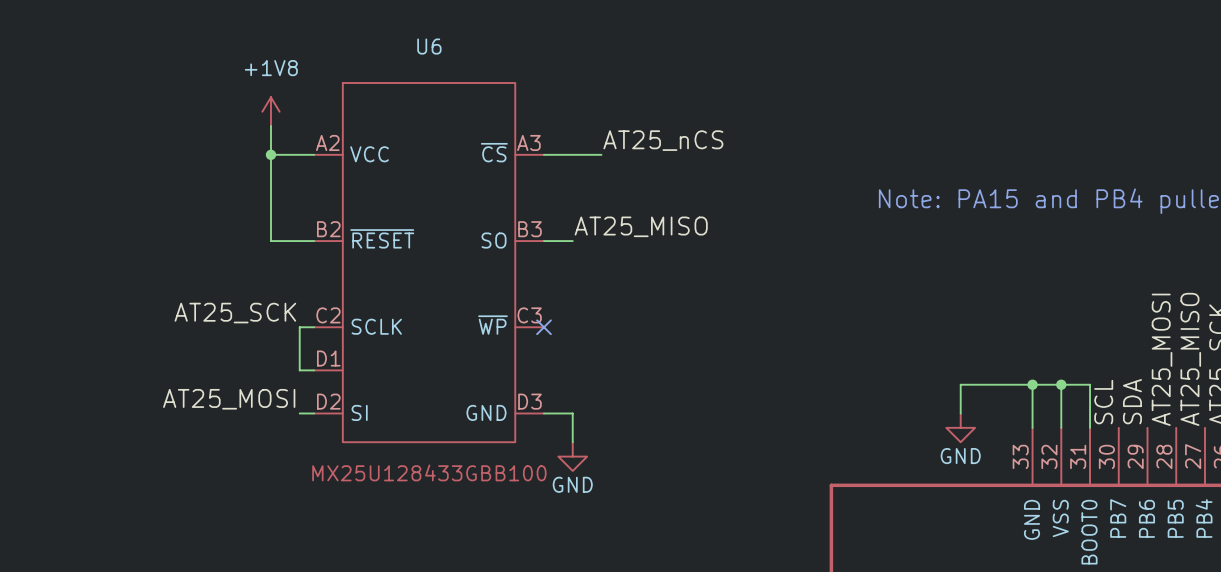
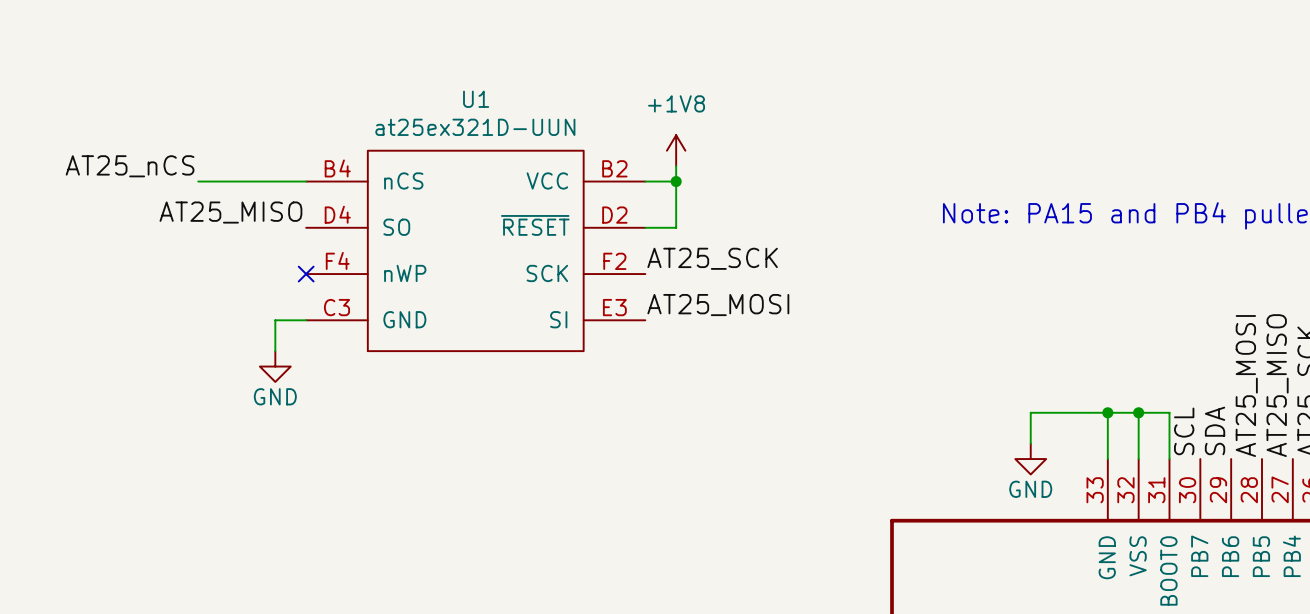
power symbol: +1V8 (270, 111) -> none
wire: (270, 126) (270, 241) (314, 241) -> none
power symbol: none -> +1V8 (676, 150)
label: AT25_nCS (663, 140) -> none
label: none -> AT25_nCS (130, 166)
wire: (270, 154) (314, 154) -> none
junction: (270, 154) -> none
wire: (544, 154) (601, 154) -> none
wire: none -> (676, 166) (676, 227) (645, 227)
wire: none -> (198, 181) (306, 181)
junction: none -> (676, 181)
label: none -> AT25_MISO (230, 212)
label: AT25_MISO (641, 226) -> AT25_SCK (712, 258)
U1: none -> at25ex321D-UUN (475, 250)
wire: (544, 241) (572, 241) -> (645, 181) (676, 181)
no-connect mark: none -> (306, 274)
U6: (429, 262) -> none
label: none -> AT25_MOSI (718, 305)
wire: none -> (306, 320) (275, 320) (275, 351)
label: AT25_SCK (235, 313) -> none
wire: (314, 327) (299, 327) (299, 370) (314, 370) -> none
no-connect mark: (544, 327) -> none
power symbol: none -> GND (275, 366)
label: AT25_MOSI (229, 399) -> none
wire: (299, 413) (314, 413) -> none
wire: (544, 413) (572, 413) (572, 442) -> none
power symbol: GND (572, 456) -> none

